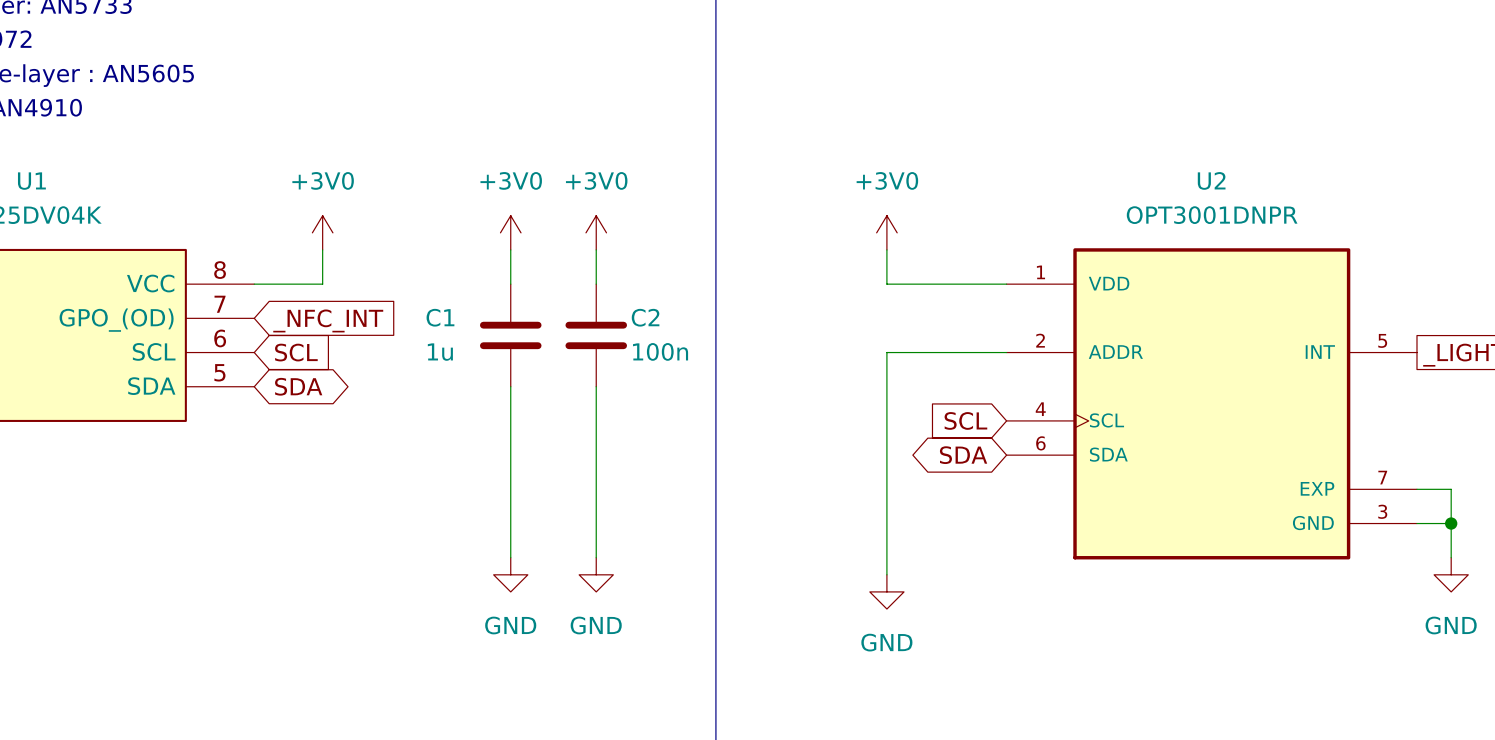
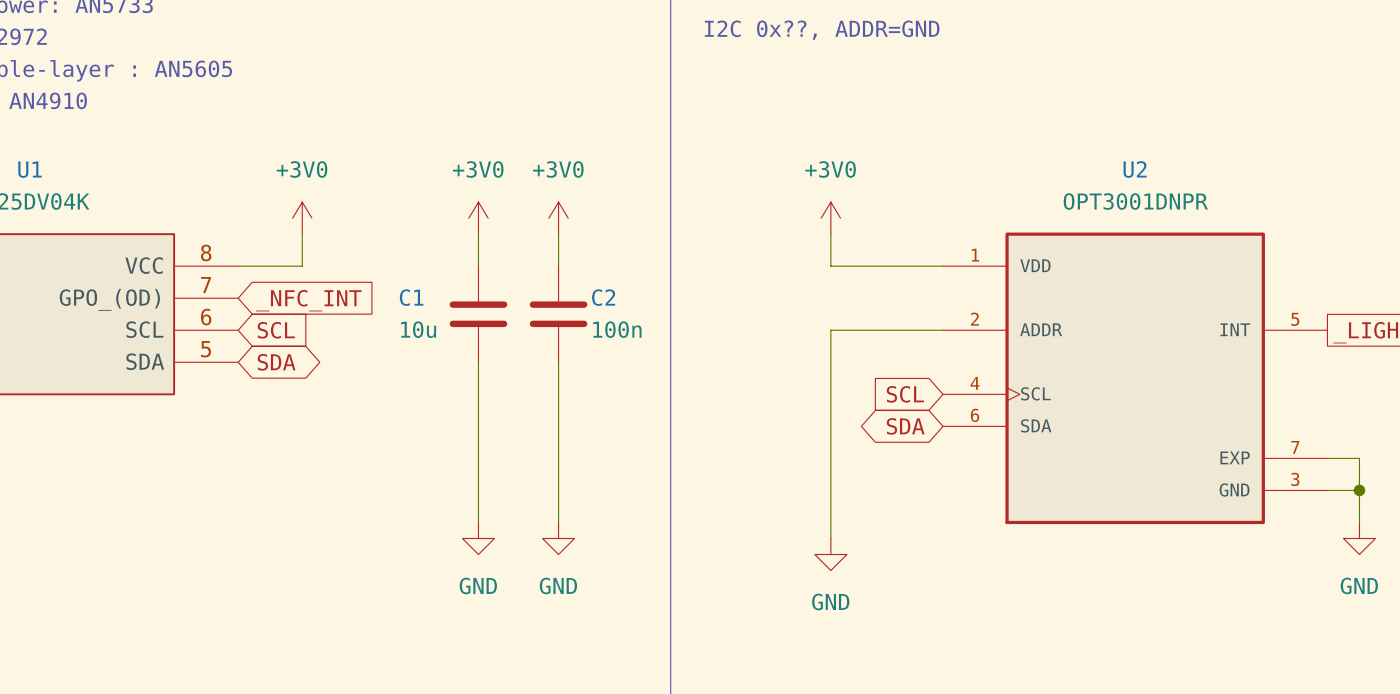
text: none -> I2C 0x??, ADDR=GND (822, 30)
C1 value: 1u (440, 352) -> 10u (418, 329)

